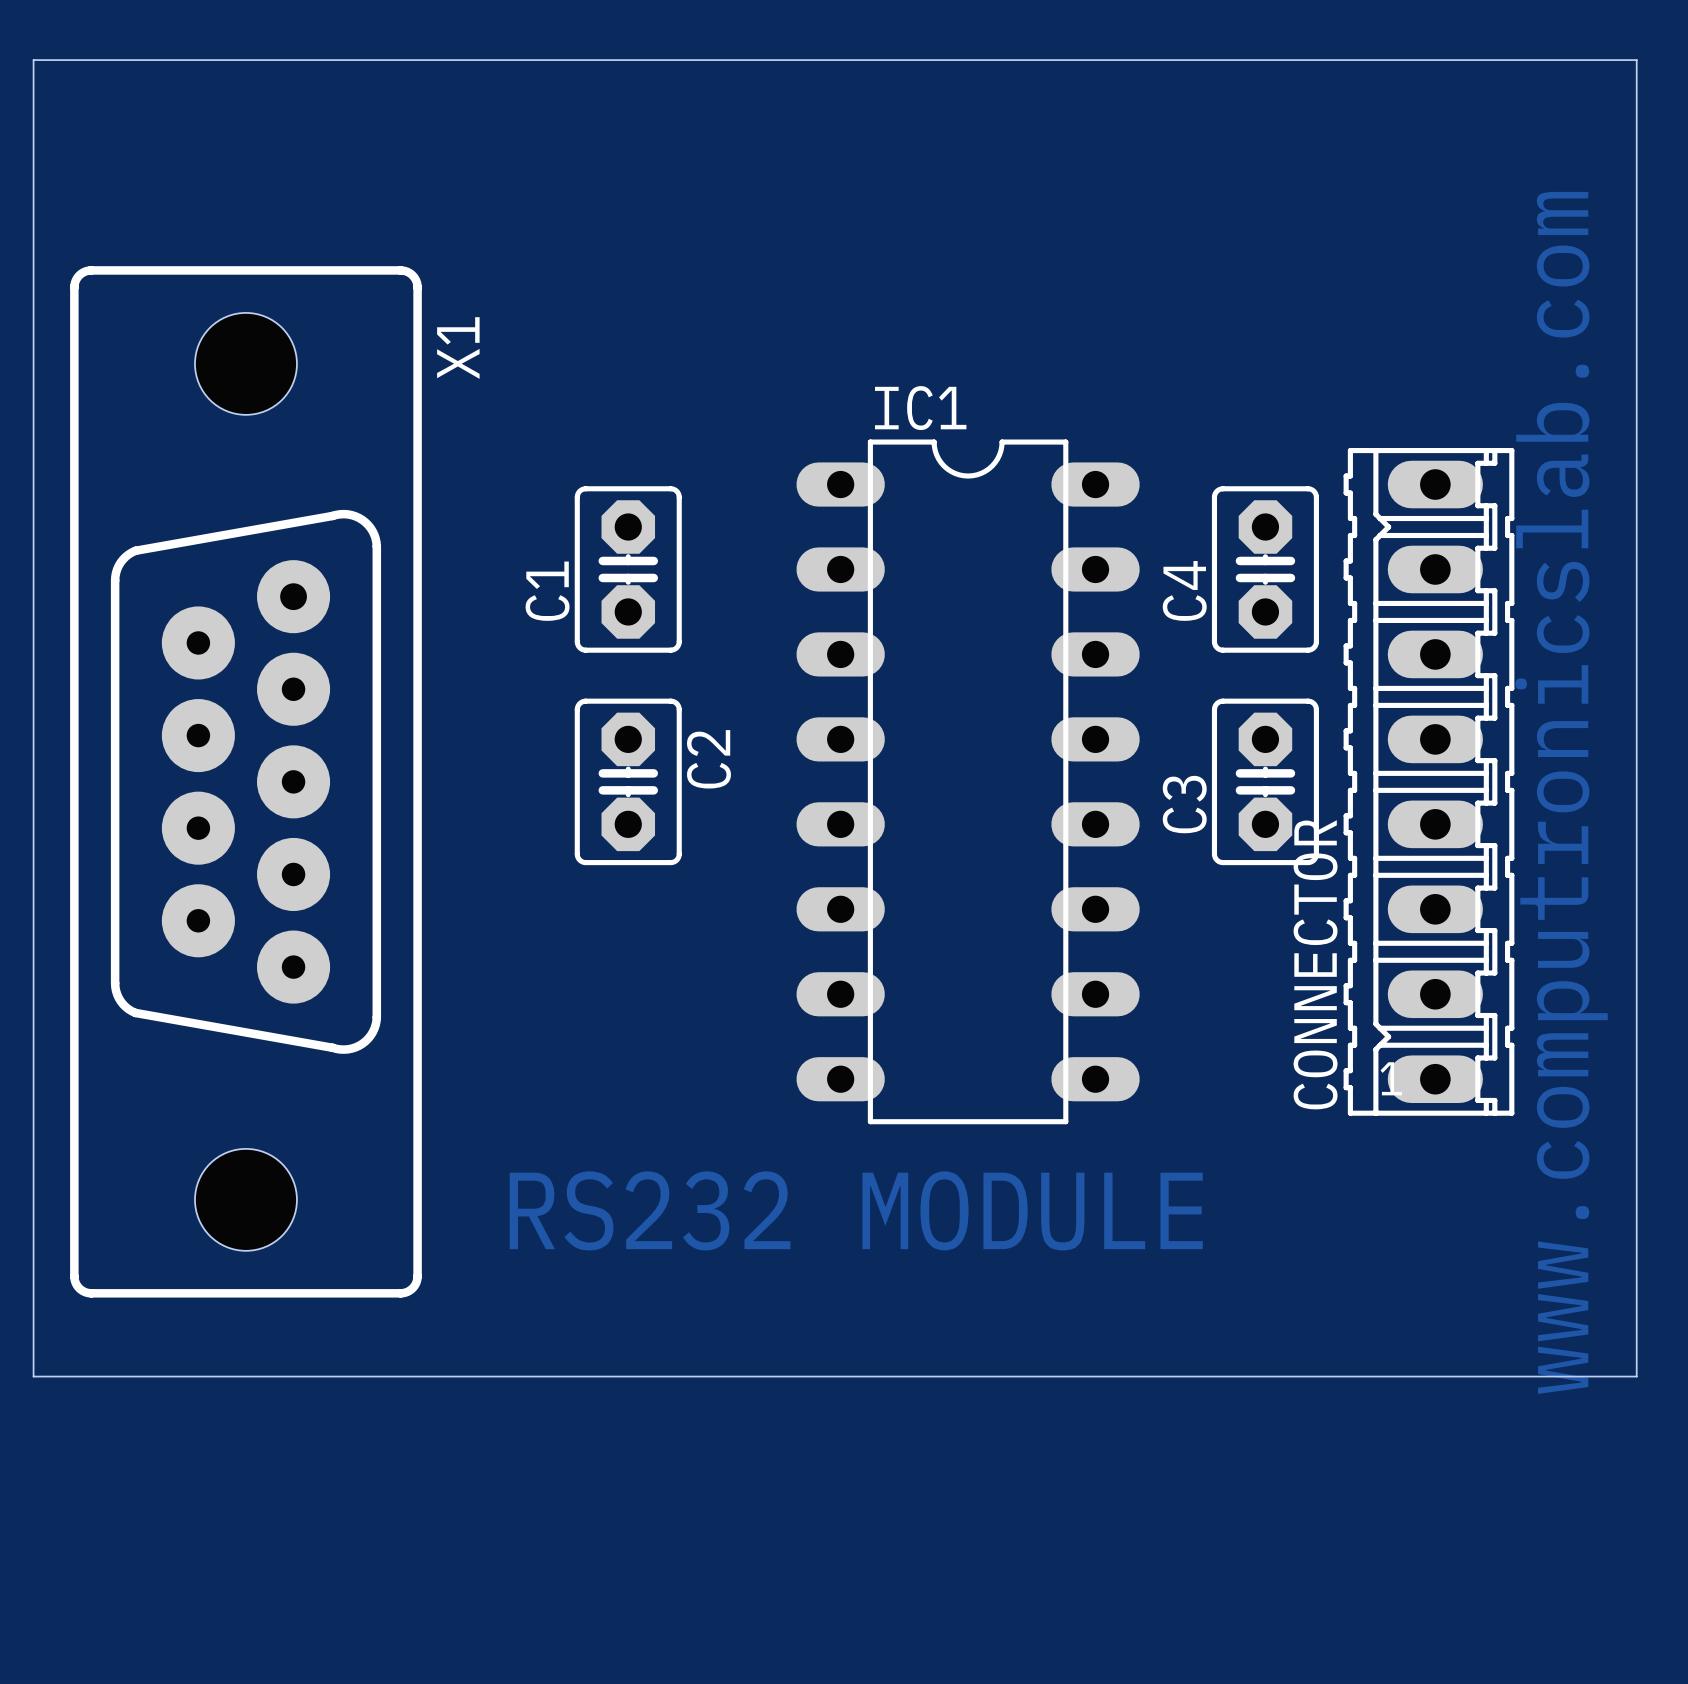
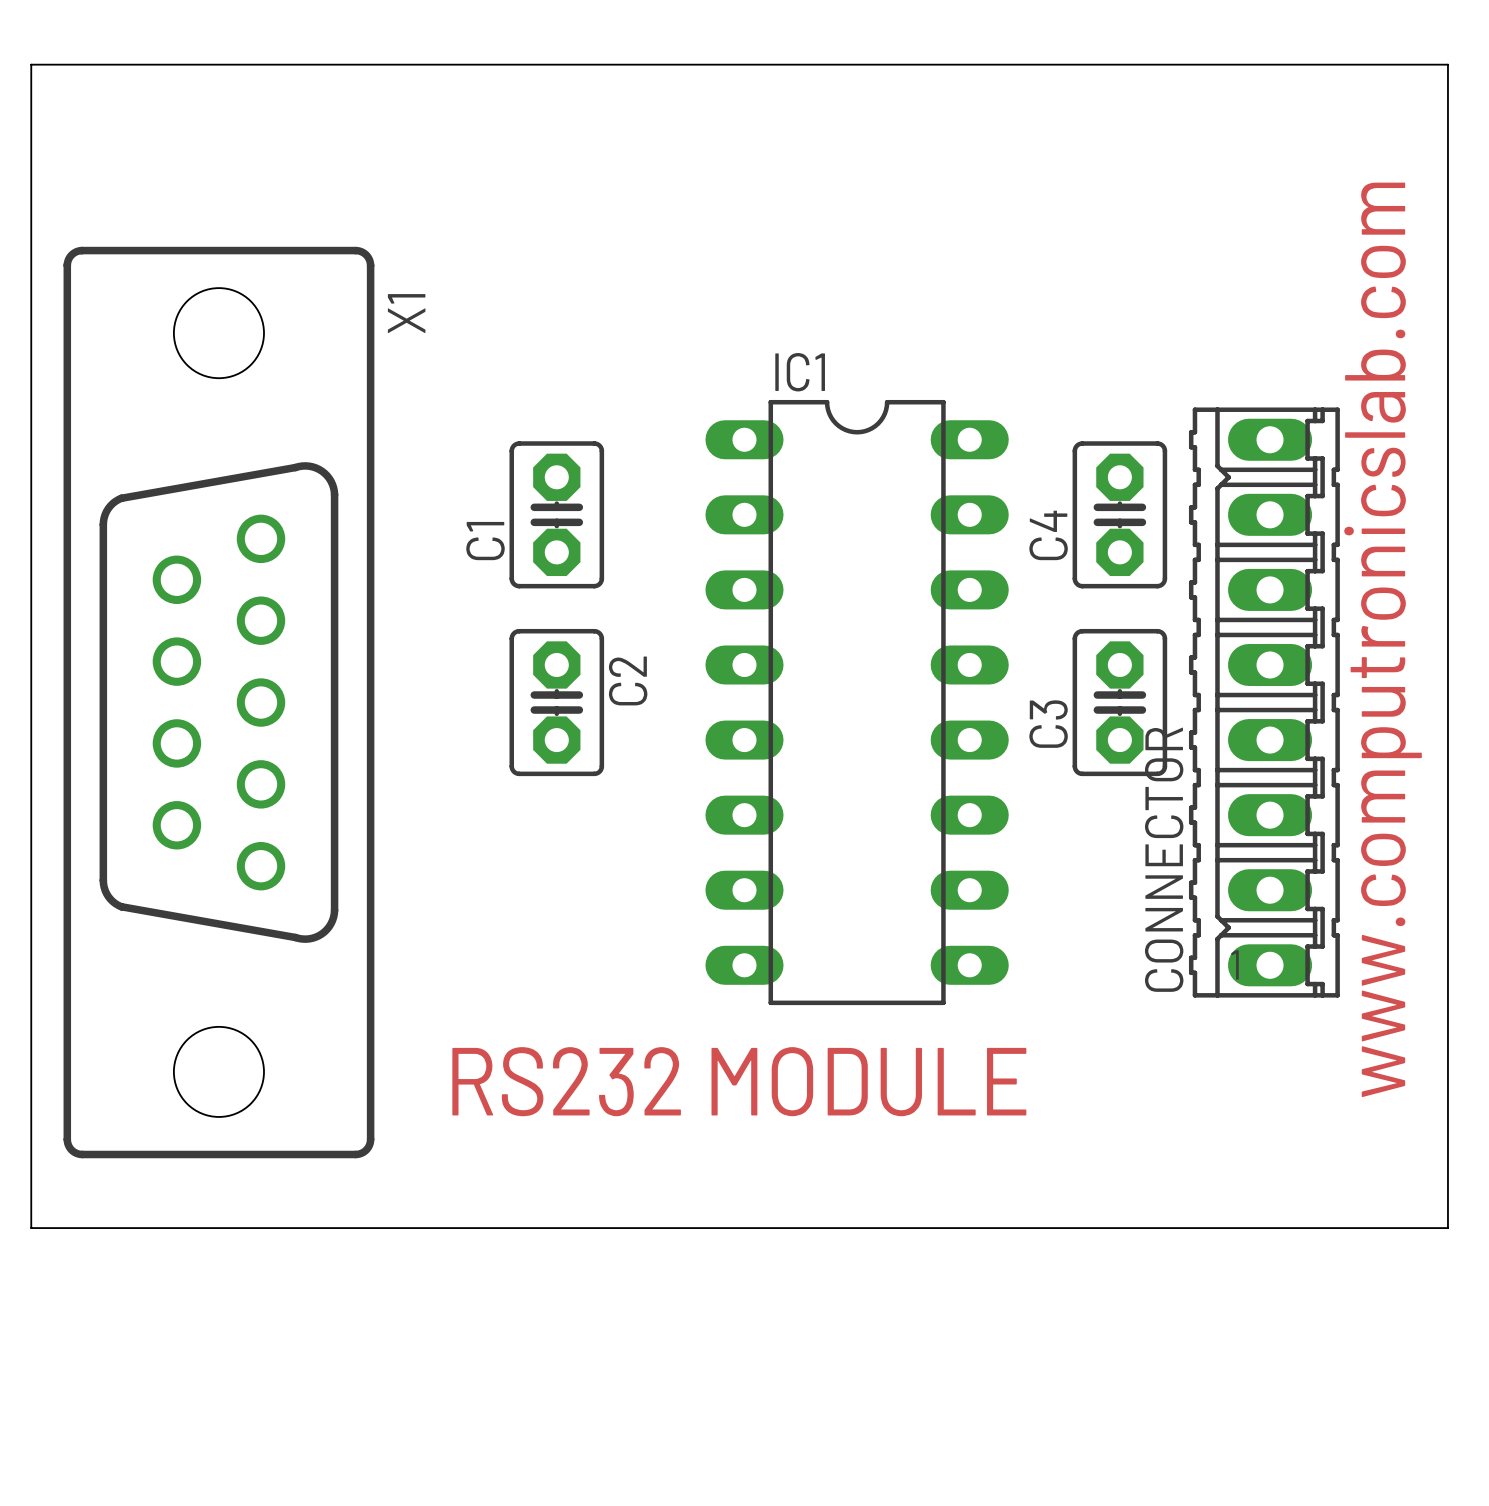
X1 footprint: [70, 266, 422, 1298] -> [63, 246, 375, 1159]

